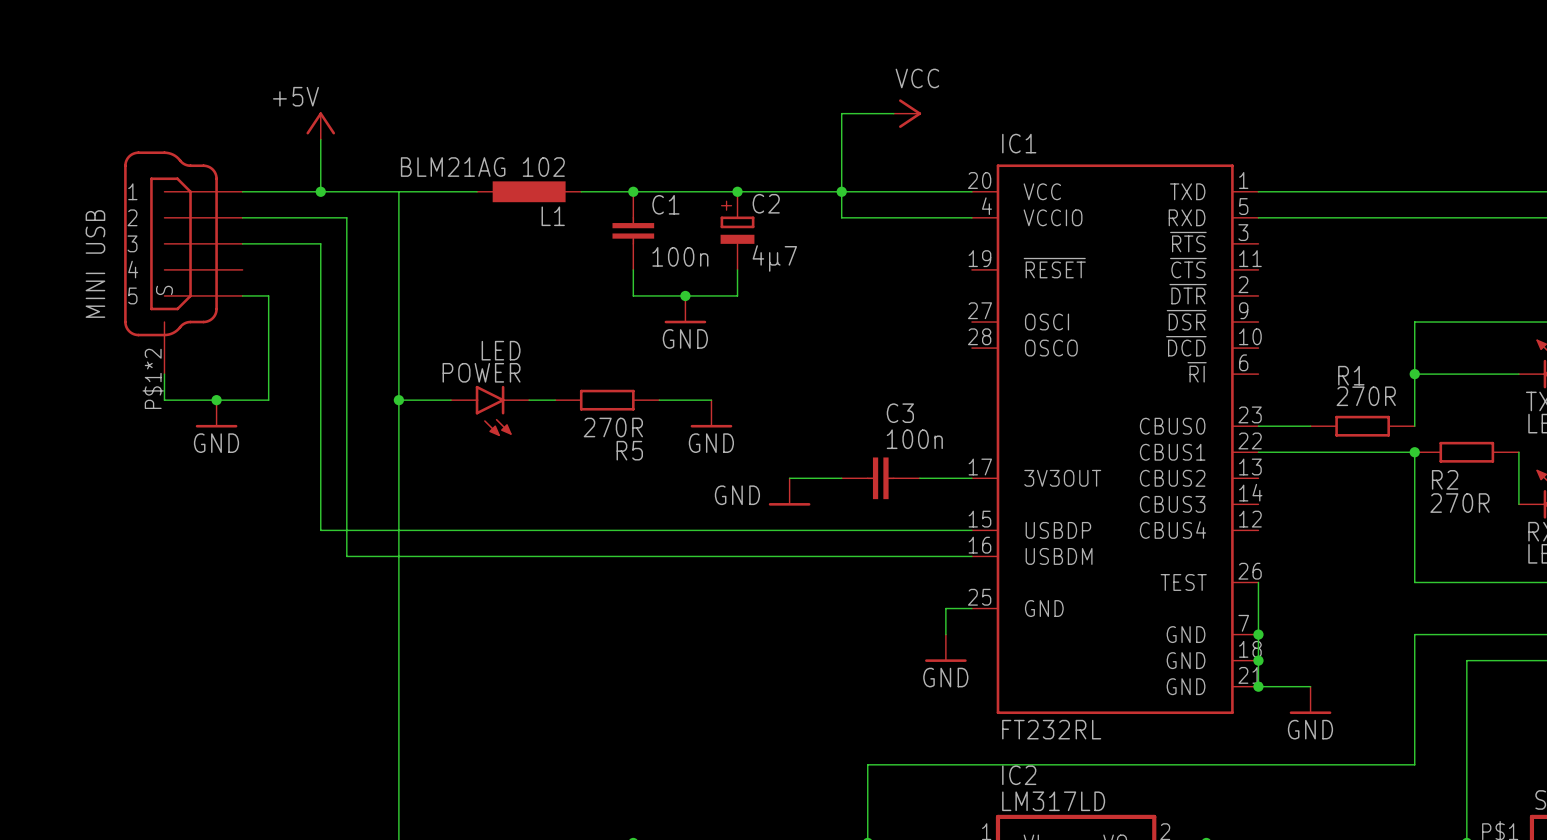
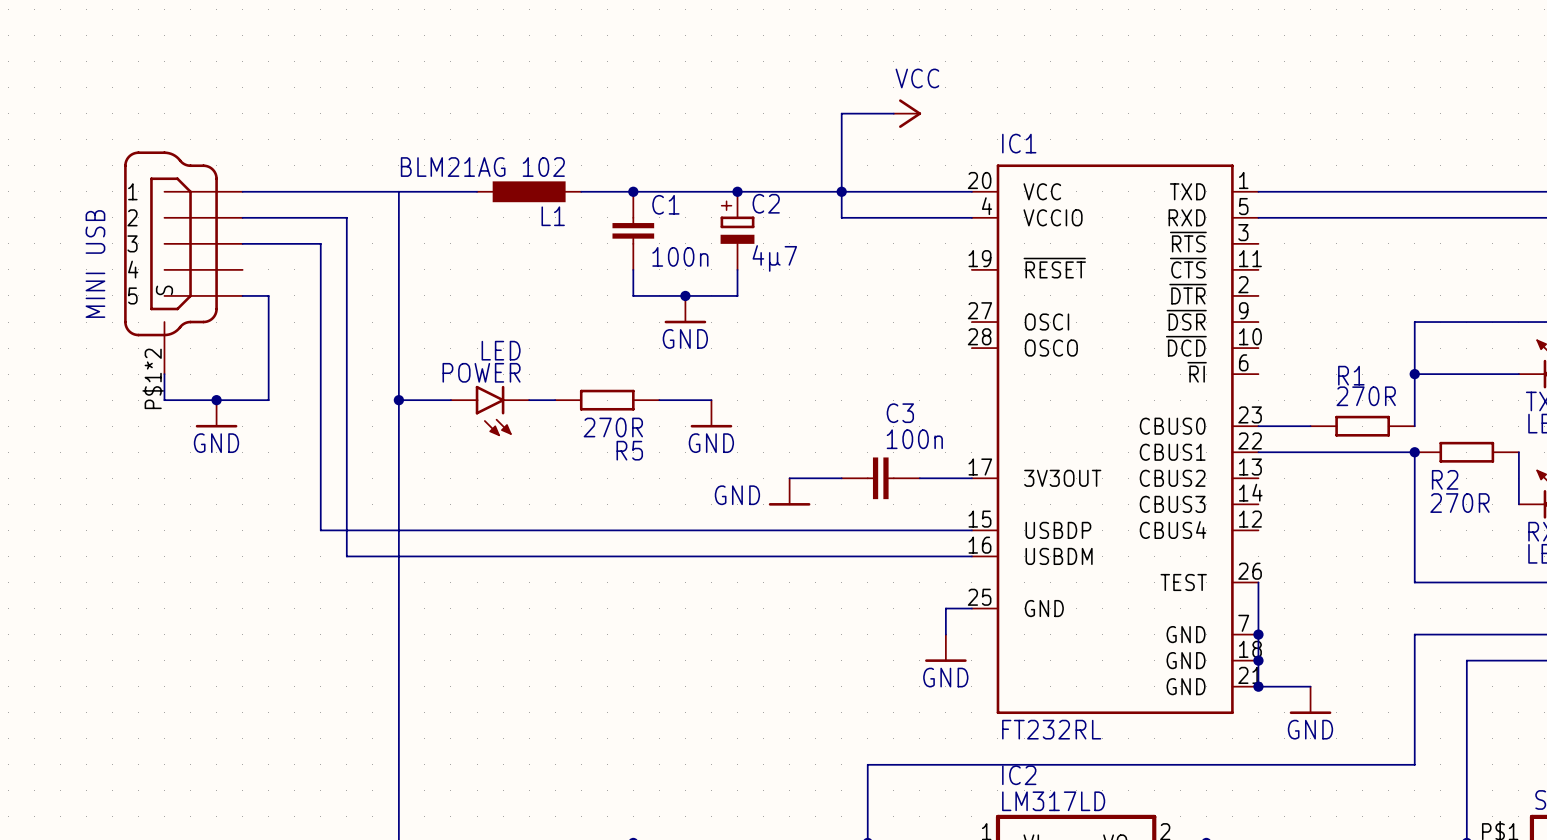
power symbol: +5V (320, 126) -> none
wire: (320, 139) (320, 191) -> none
junction: (320, 191) -> none

